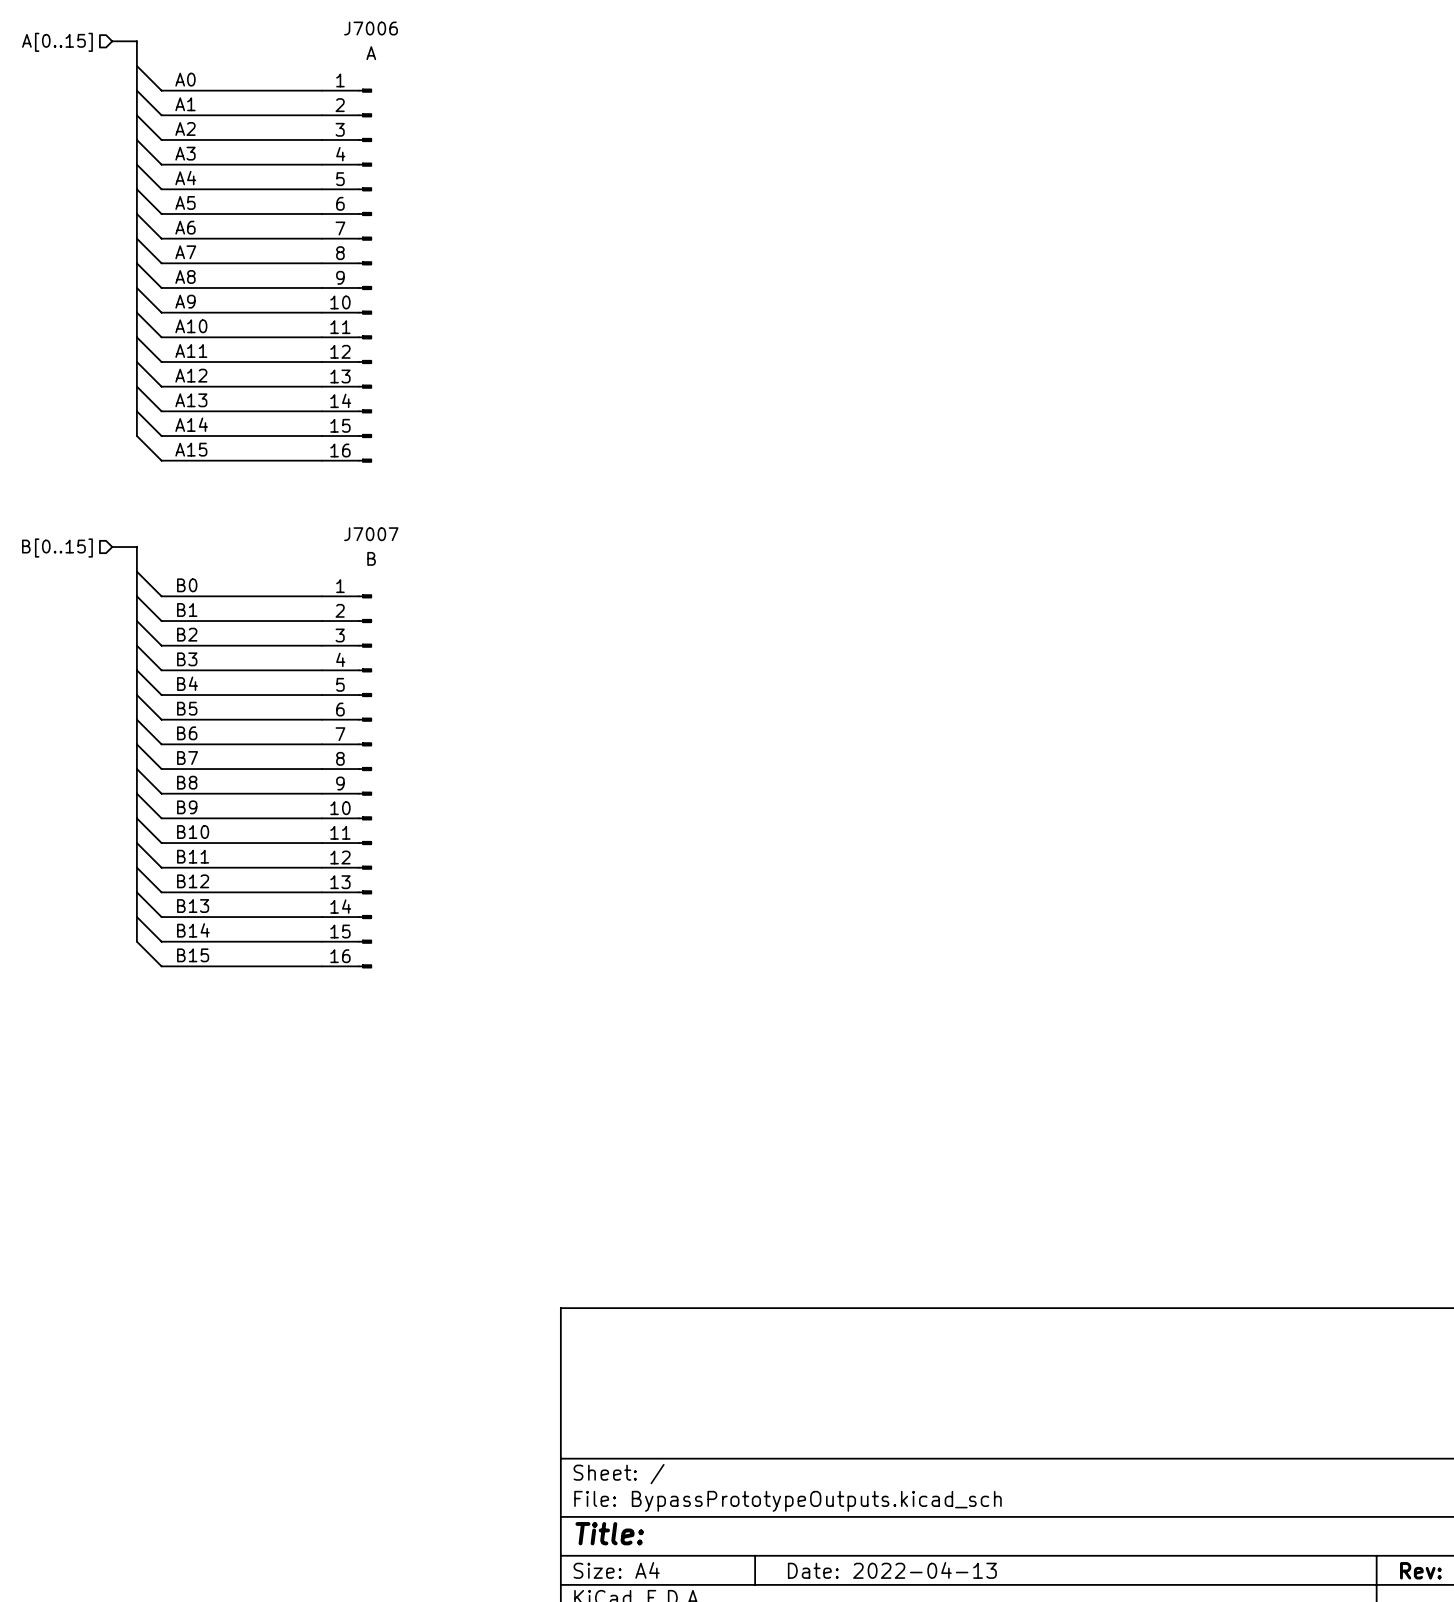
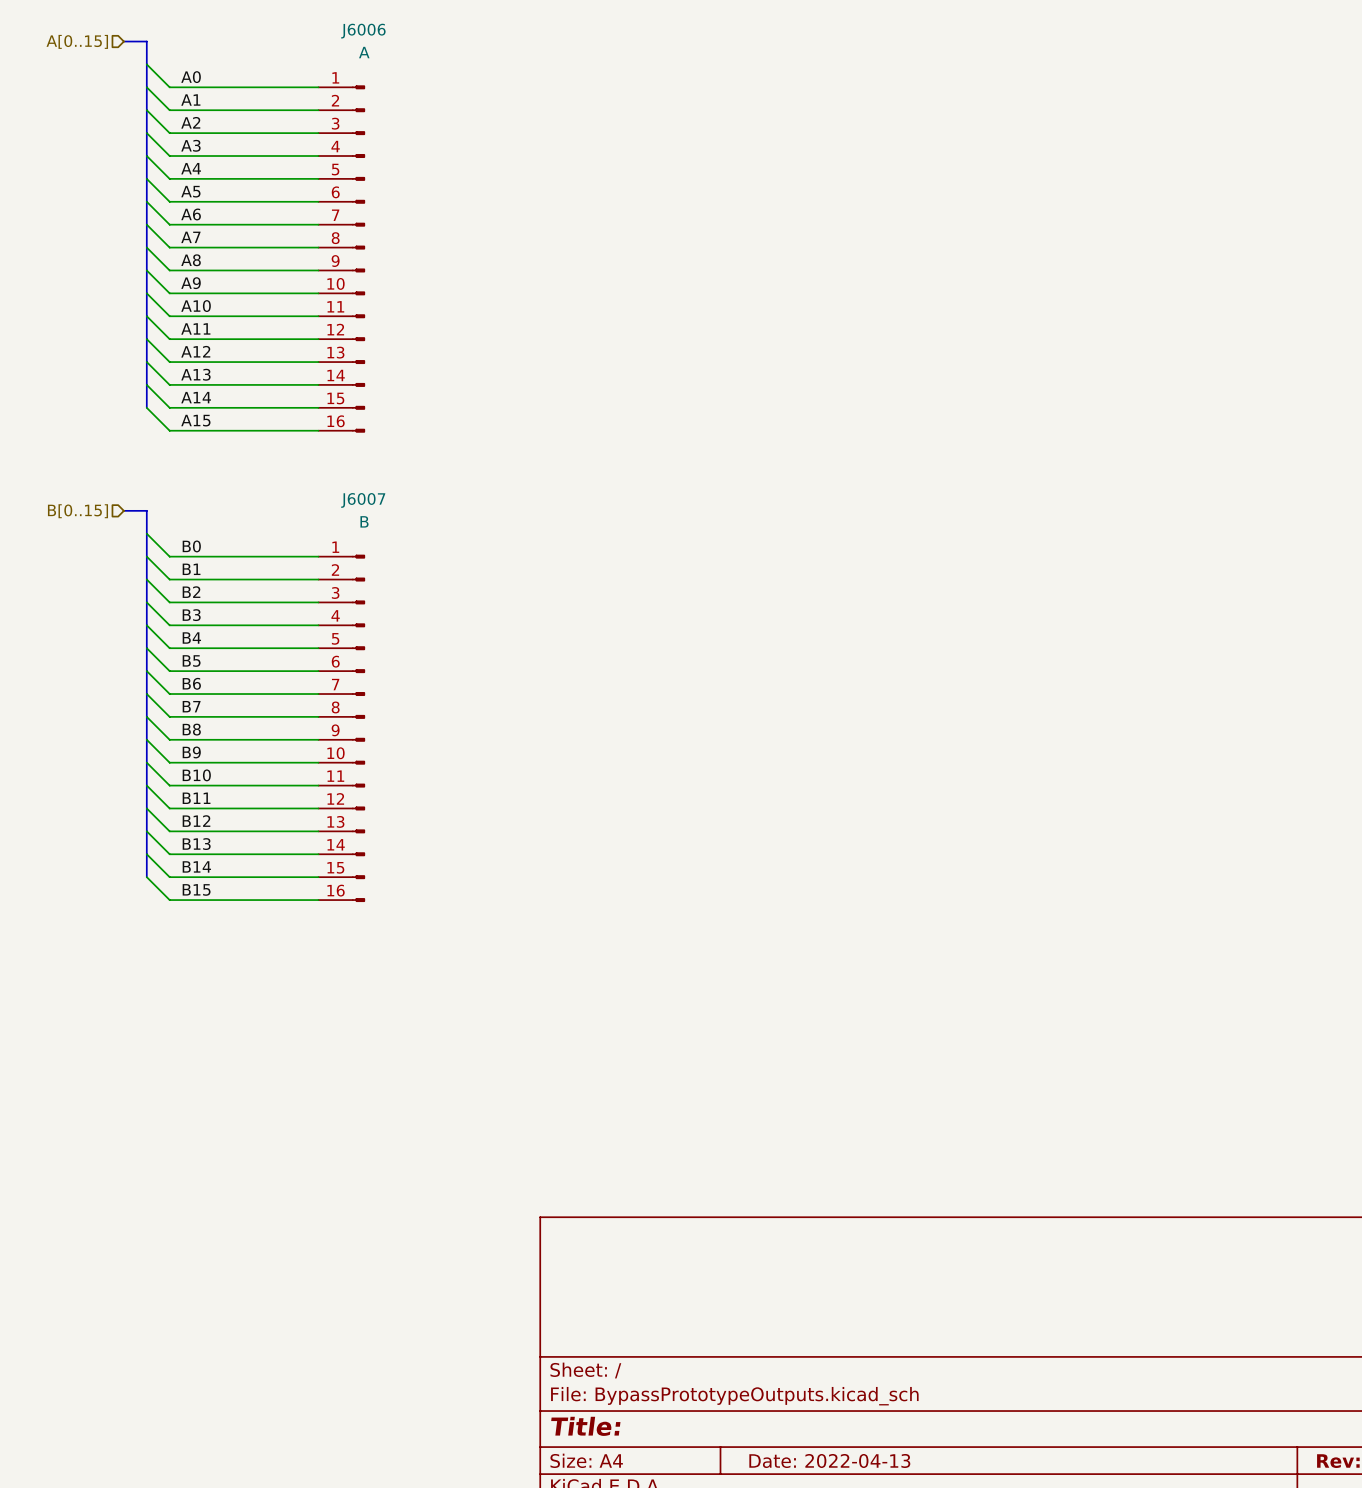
J7006 name: J7006 (370, 28) -> J6006 (363, 31)
J7007 name: J7007 (371, 534) -> J6007 (363, 500)

